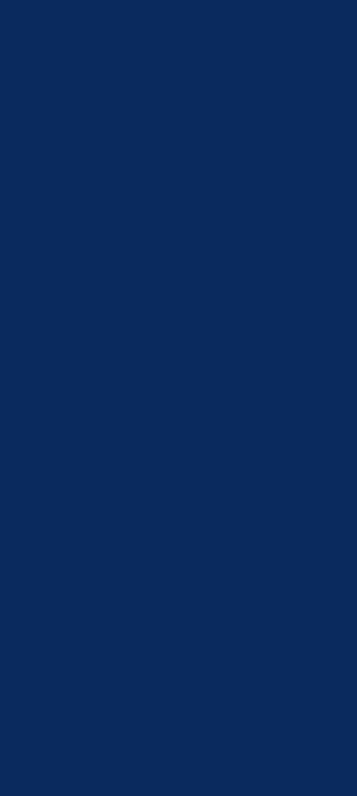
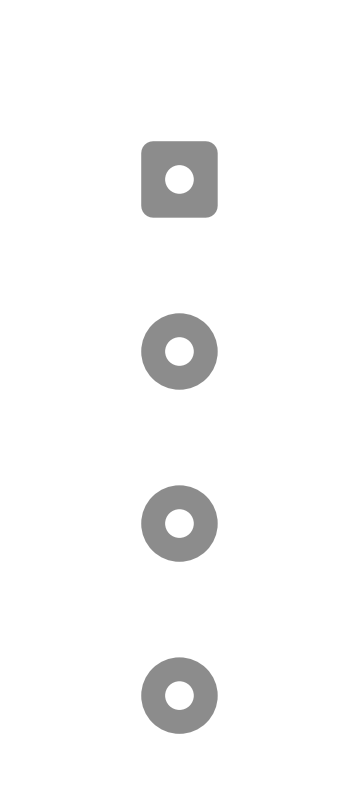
part: none -> (179, 437)

